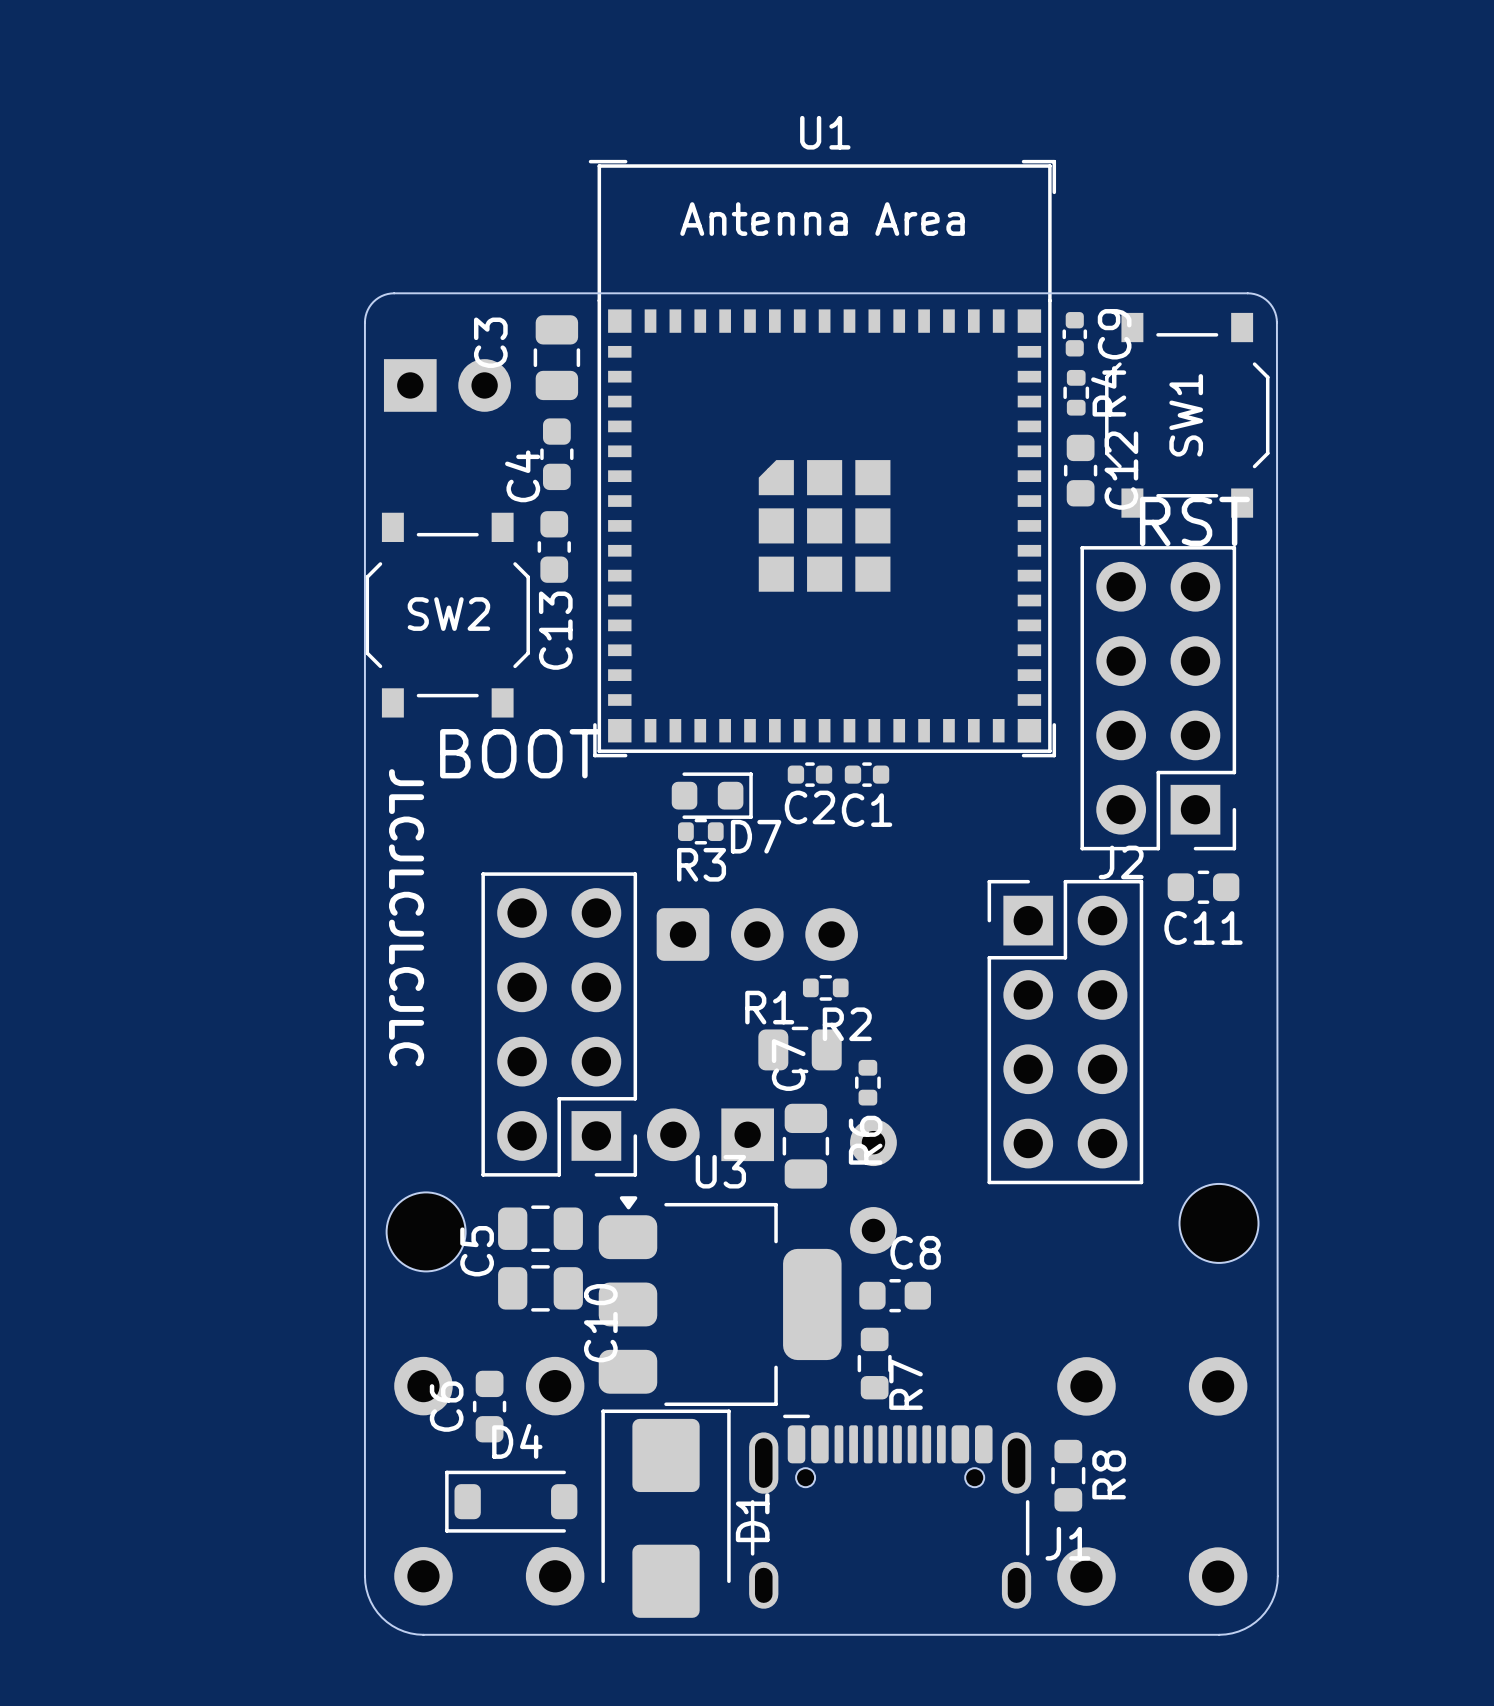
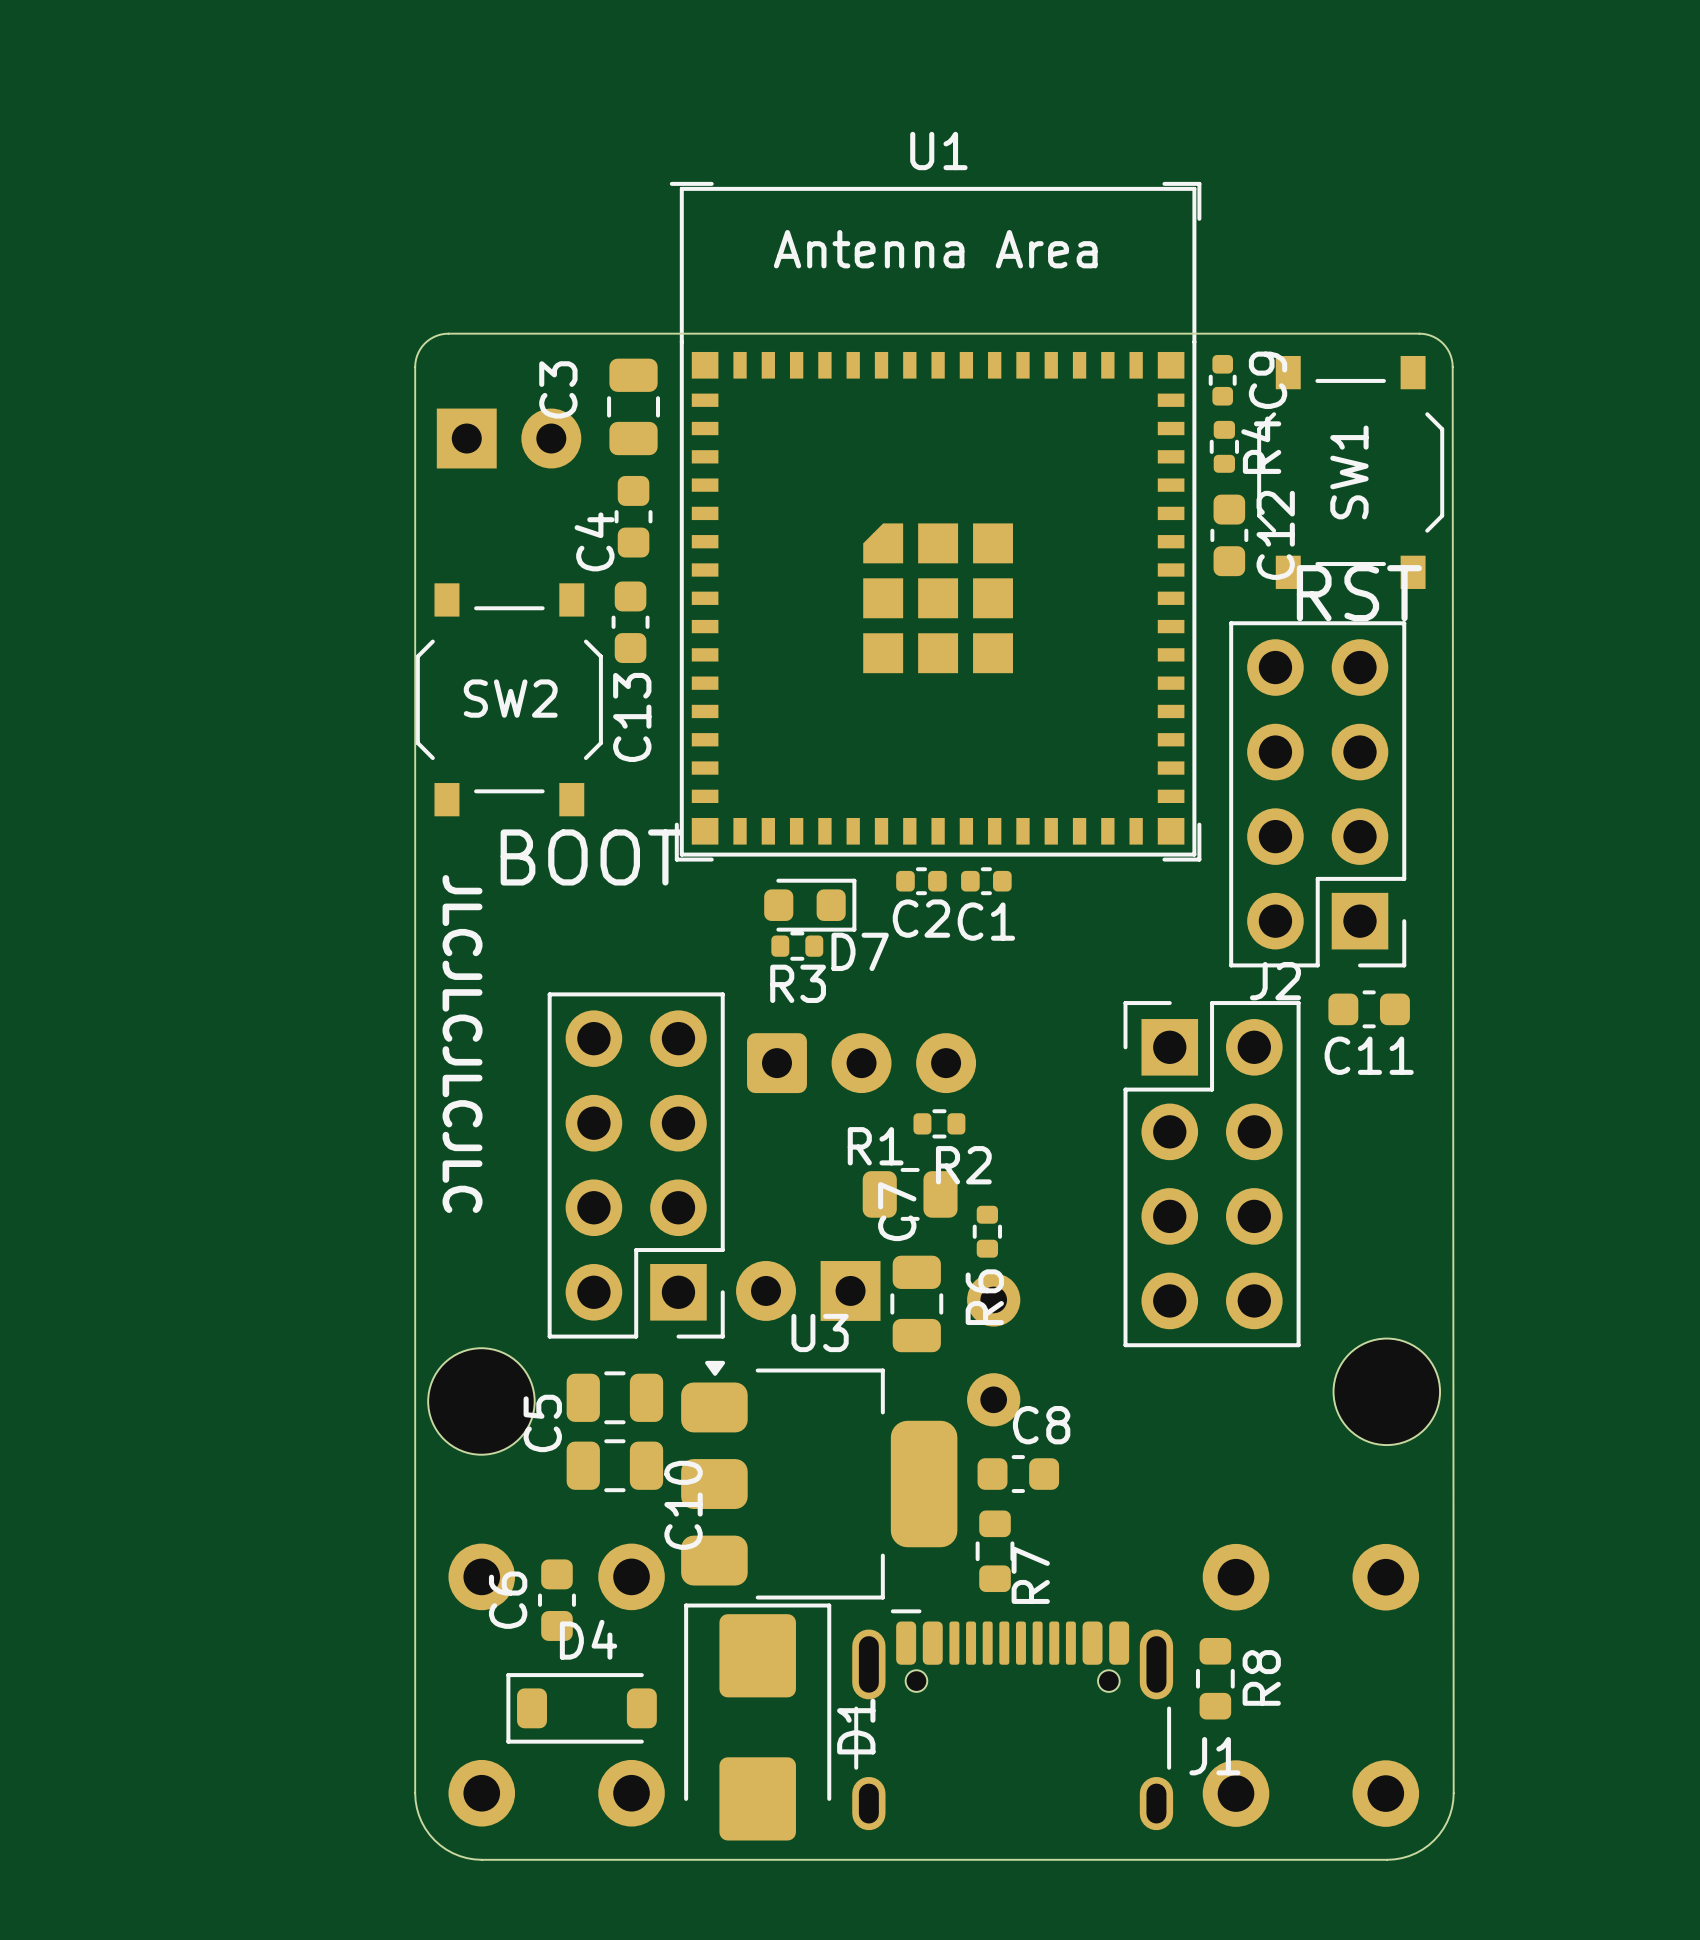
part footprint: [1179, 1183, 1259, 1263] -> [1333, 1338, 1441, 1446]
part footprint: [386, 1192, 466, 1272] -> [428, 1348, 535, 1455]

